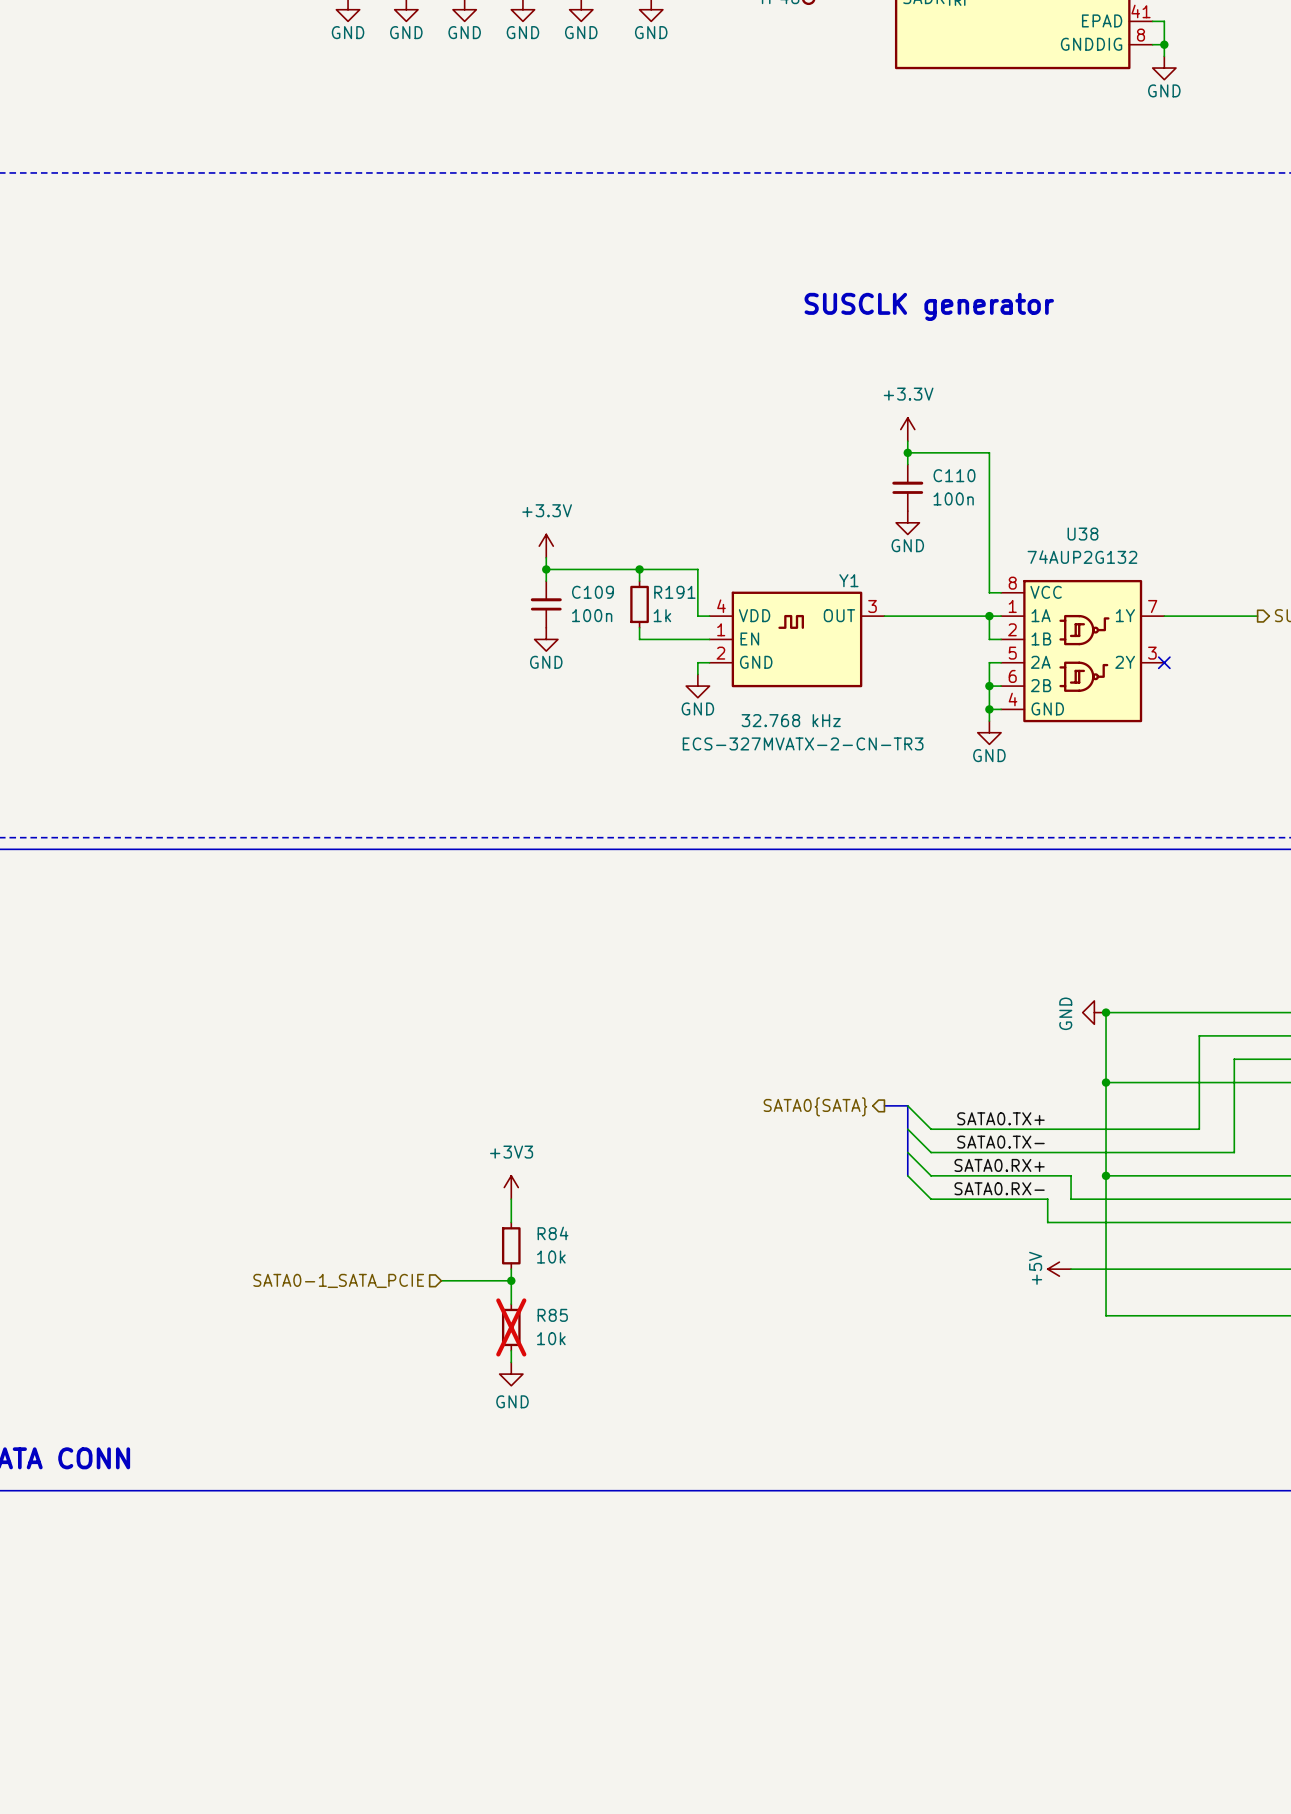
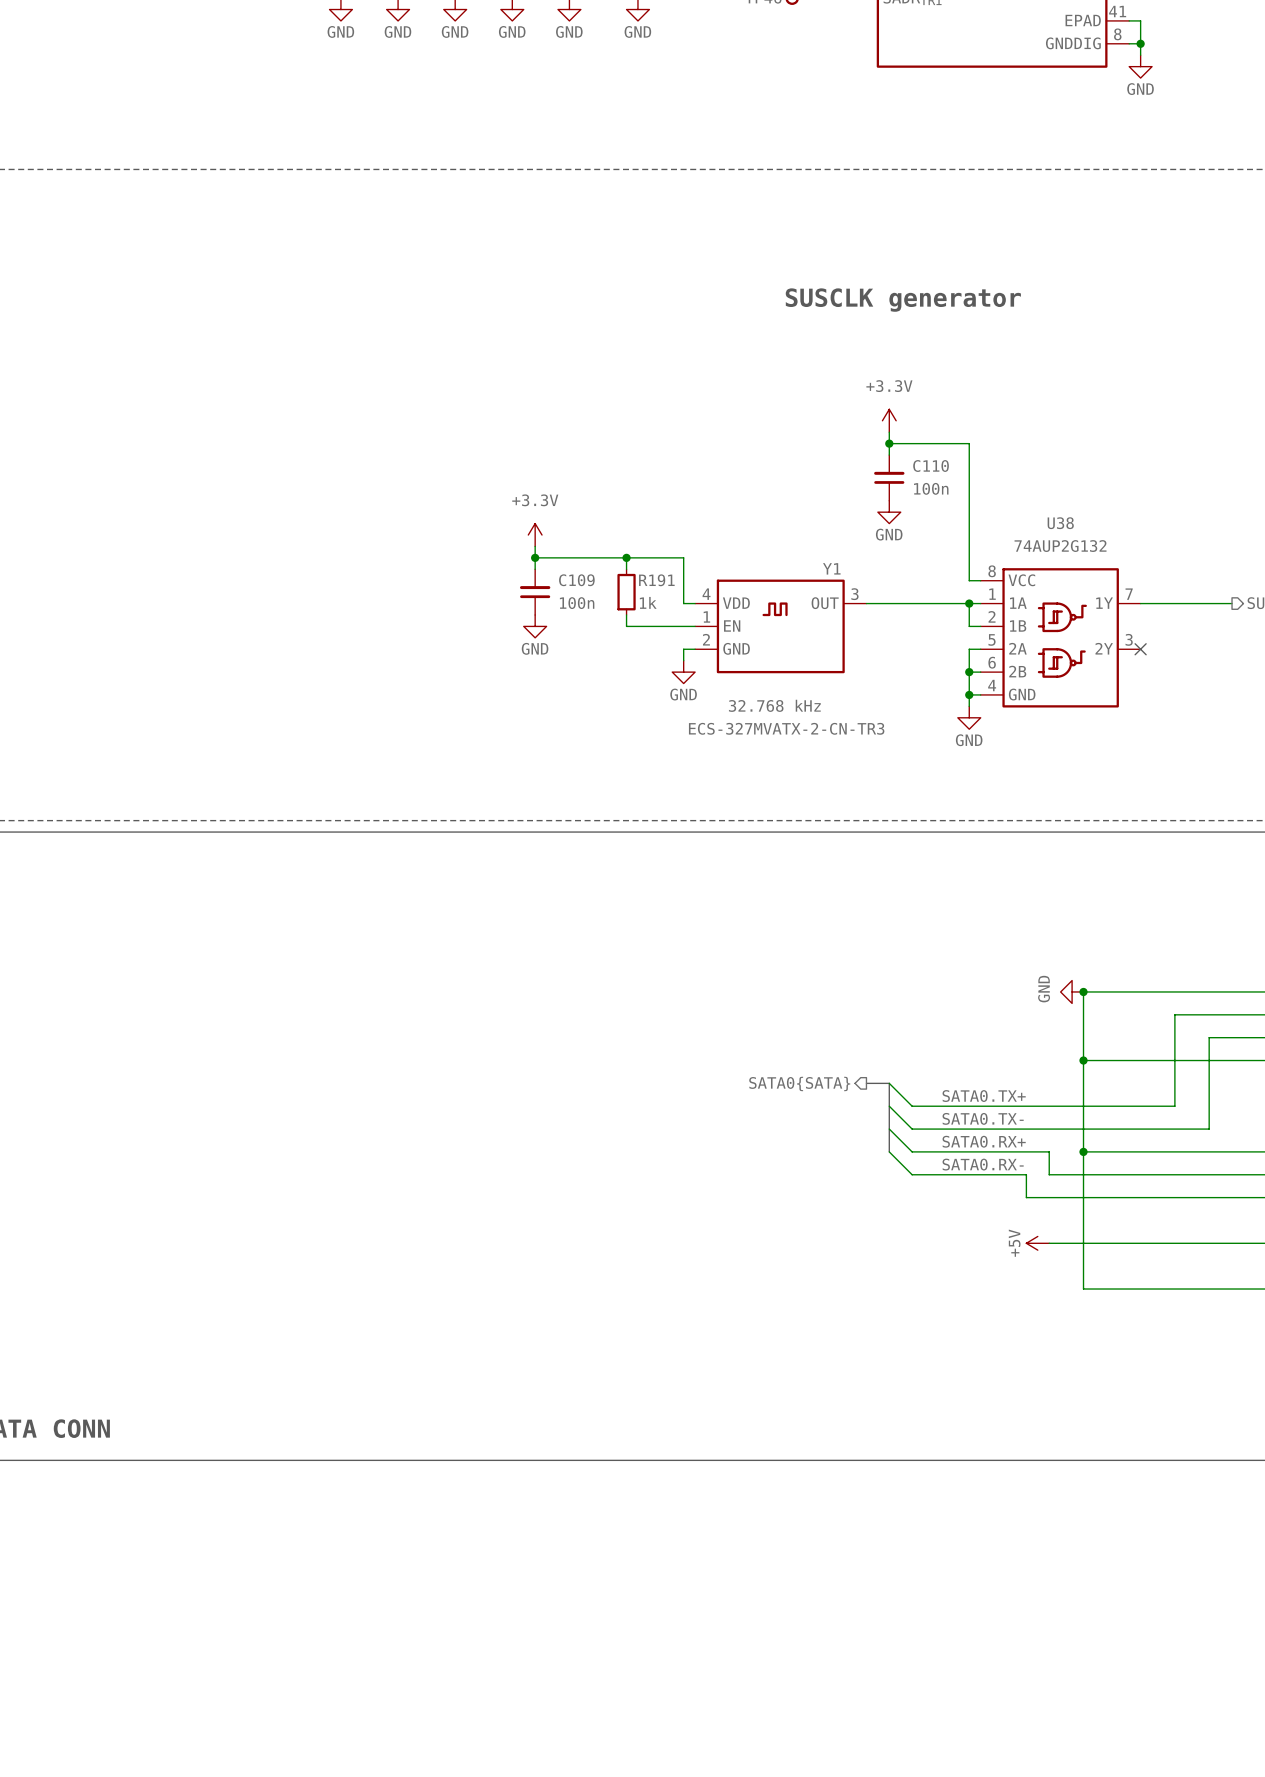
power symbol: +3V3 (511, 1187) -> none
wire: (511, 1199) (511, 1222) -> none
R84: (511, 1245) -> none
wire: (511, 1269) (511, 1304) -> none
hierarchical label: SATA0-1_SATA_PCIE (338, 1280) -> none
wire: (441, 1280) (511, 1280) -> none
junction: (511, 1280) -> none
R85: (511, 1327) -> none
wire: (511, 1350) (511, 1362) -> none
power symbol: GND (511, 1374) -> none

